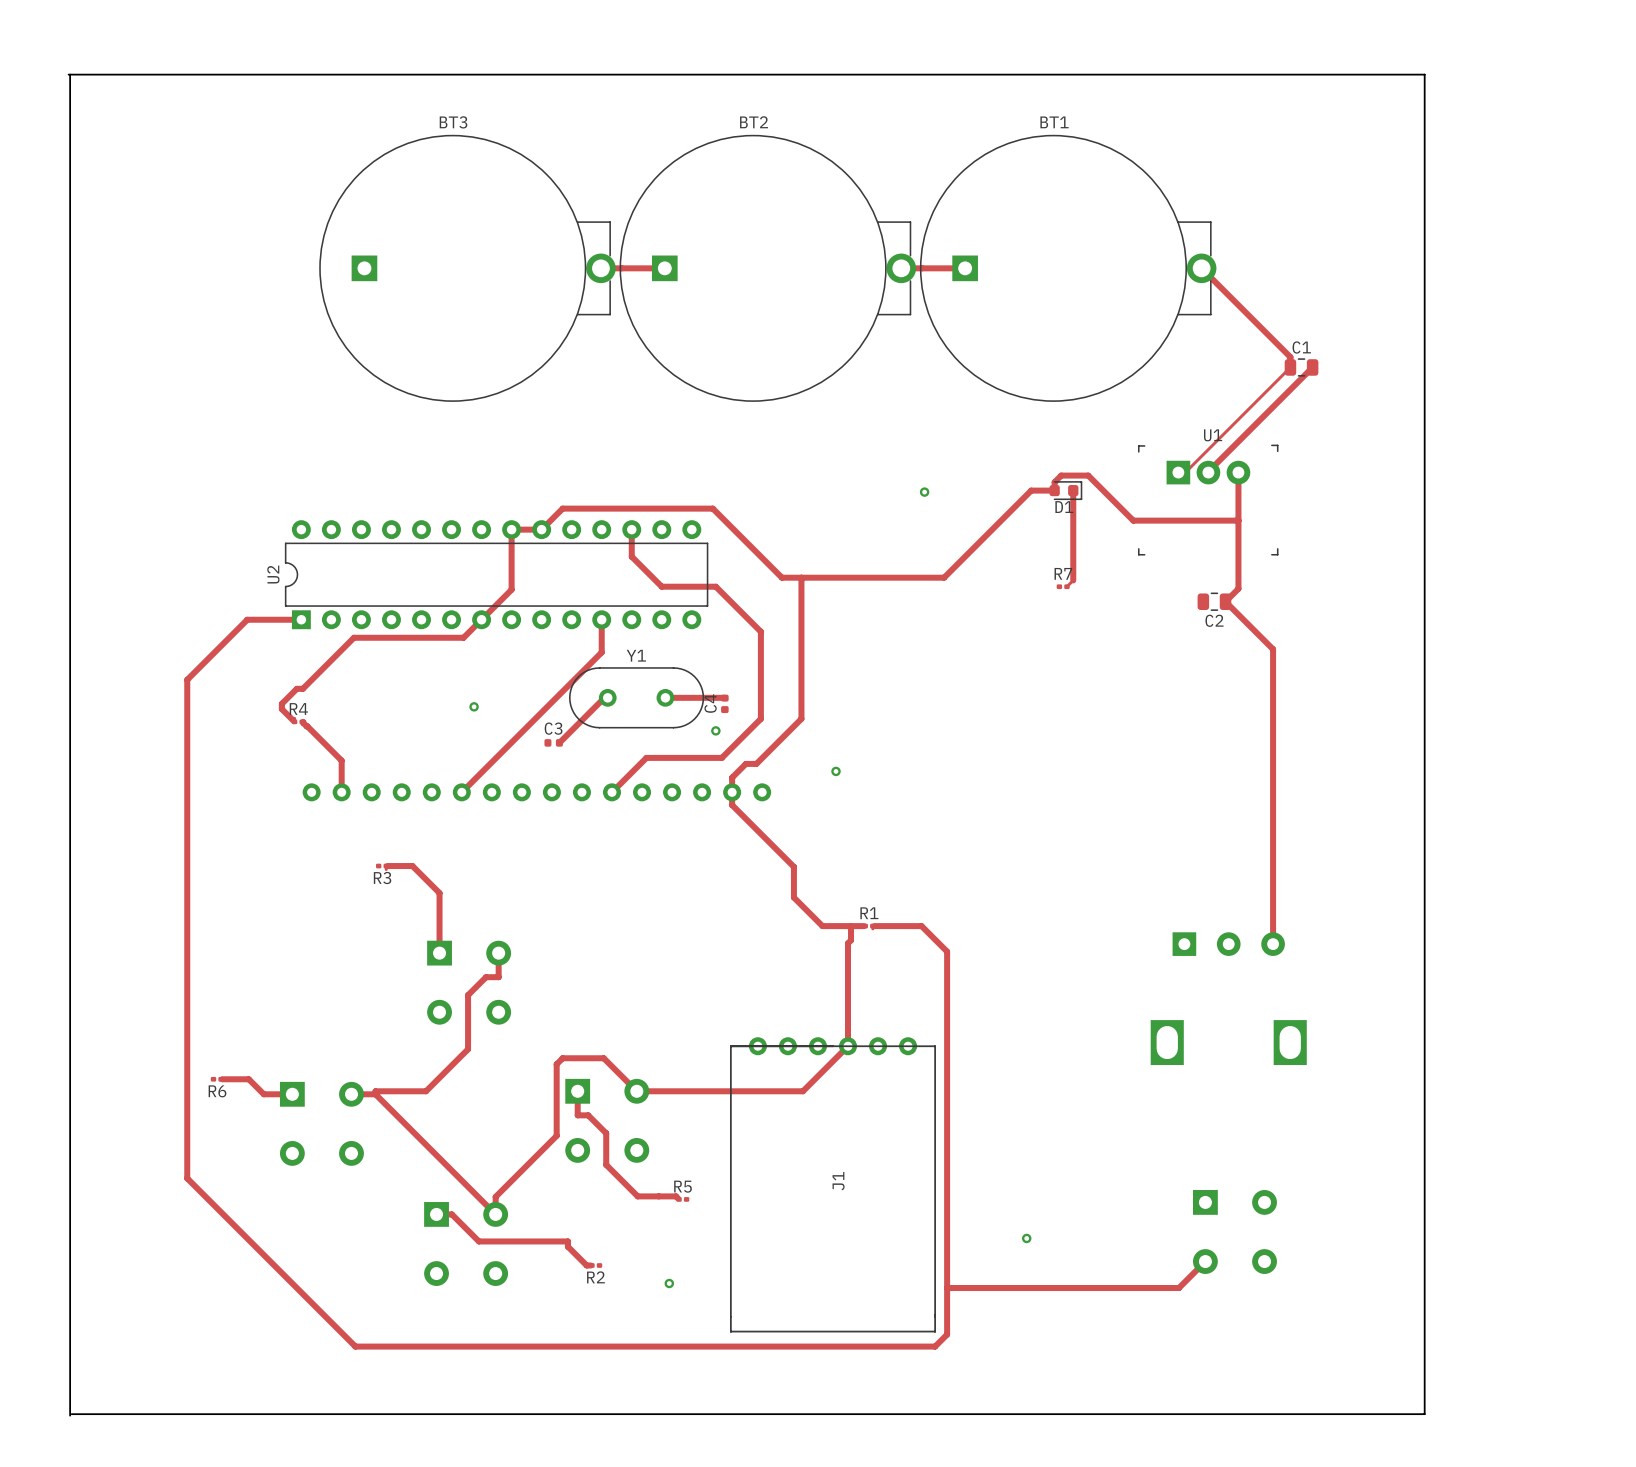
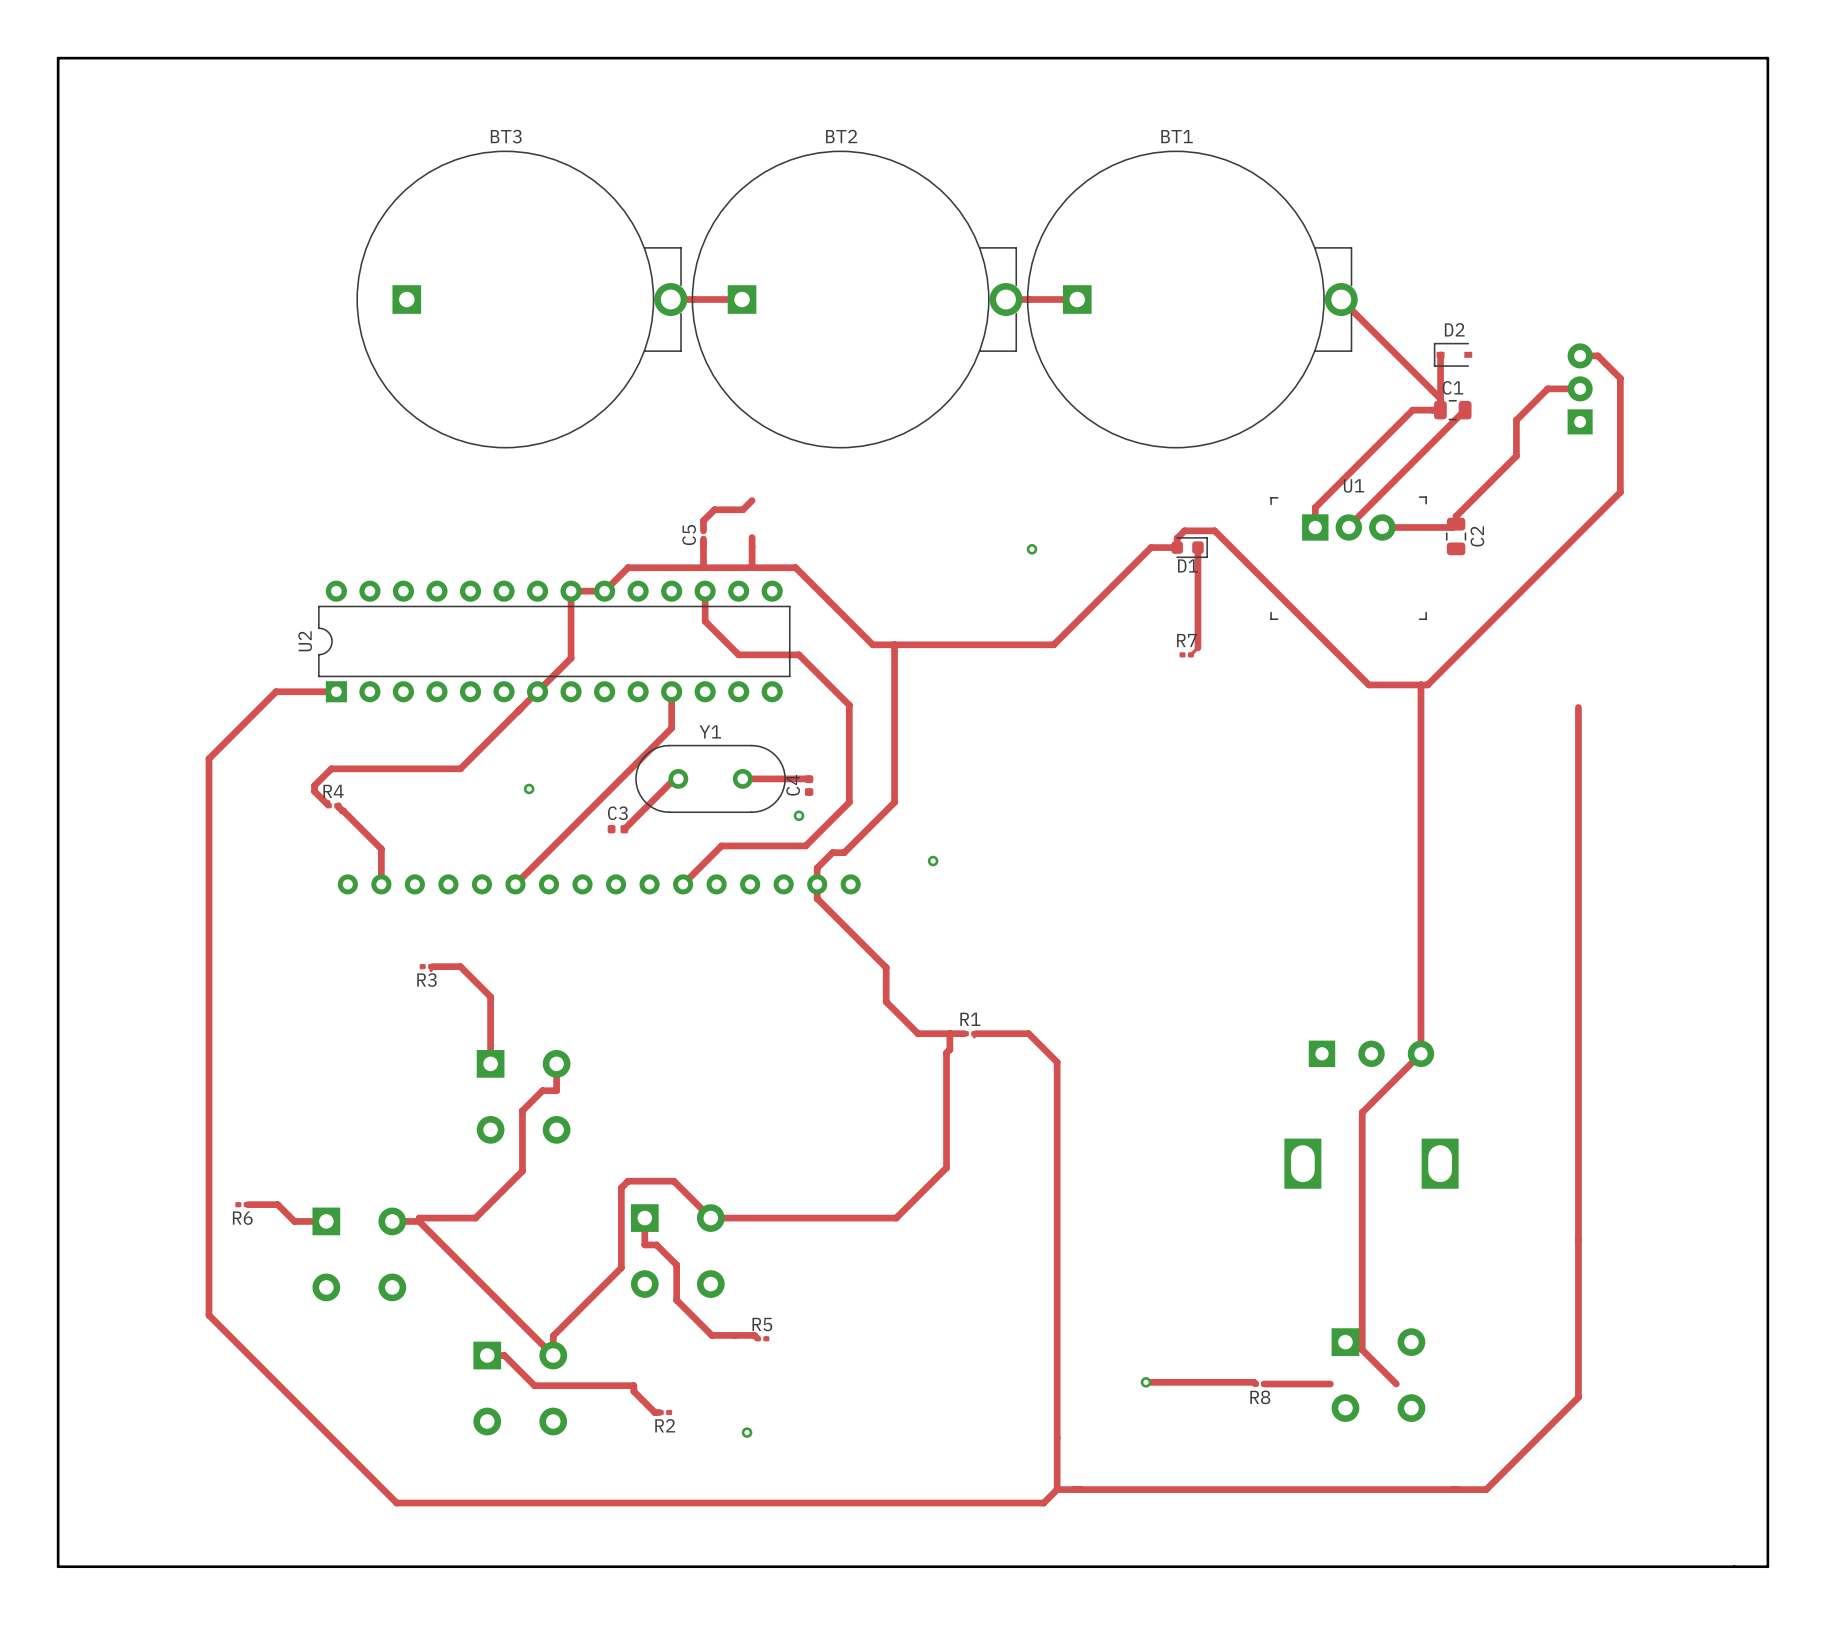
board edge: none -> (58, 58) (1767, 58) (1767, 1566) (58, 1566) (58, 58)
board edge: (68, 74) (1424, 74) (1424, 1414) (71, 1414) -> none
board edge: (70, 74) (70, 1415) -> none
track: none -> (1440, 354) (1440, 409) (1412, 410) (1315, 507) (1315, 527)
D2: none -> (1453, 354)
track: none -> (1580, 388) (1547, 388) (1516, 420) (1516, 456) (1456, 516) (1456, 524) (1452, 527) (1382, 527)
part: none -> (1580, 388)
track: (1290, 367) (1185, 472) -> none
track: none -> (752, 500) (742, 509) (714, 509) (703, 520) (703, 530)
track: (1238, 472) (1238, 588) (1225, 601) (1273, 649) -> (1420, 684) (1420, 724)
C5: none -> (703, 535)
track: none -> (752, 537) (752, 567)
track: none -> (703, 539) (703, 567)
track: (1133, 520) (1238, 520) -> (1265, 581) (1368, 684) (1427, 684) (1620, 492) (1620, 378) (1597, 355) (1580, 355)
C2 rotation: 0° (1214, 601) -> 90° clockwise (1456, 536)
C2 position: (1214, 601) -> (1456, 536)
C2 name position: C2 (1214, 620) -> C2 (1477, 536)
track: none -> (1578, 707) (1578, 1397) (1486, 1489) (1057, 1489)
track: (463, 637) (353, 637) (302, 688) -> (517, 711) (460, 768) (338, 768)
track: none -> (1420, 1053) (1362, 1112) (1362, 1349) (1396, 1384)
J1: (832, 1184) -> none
track: none -> (1145, 1382) (1255, 1383)
R8: none -> (1259, 1384)
track: none -> (1264, 1384) (1330, 1384)
track: (1205, 1261) (1178, 1288) (947, 1288) -> none

